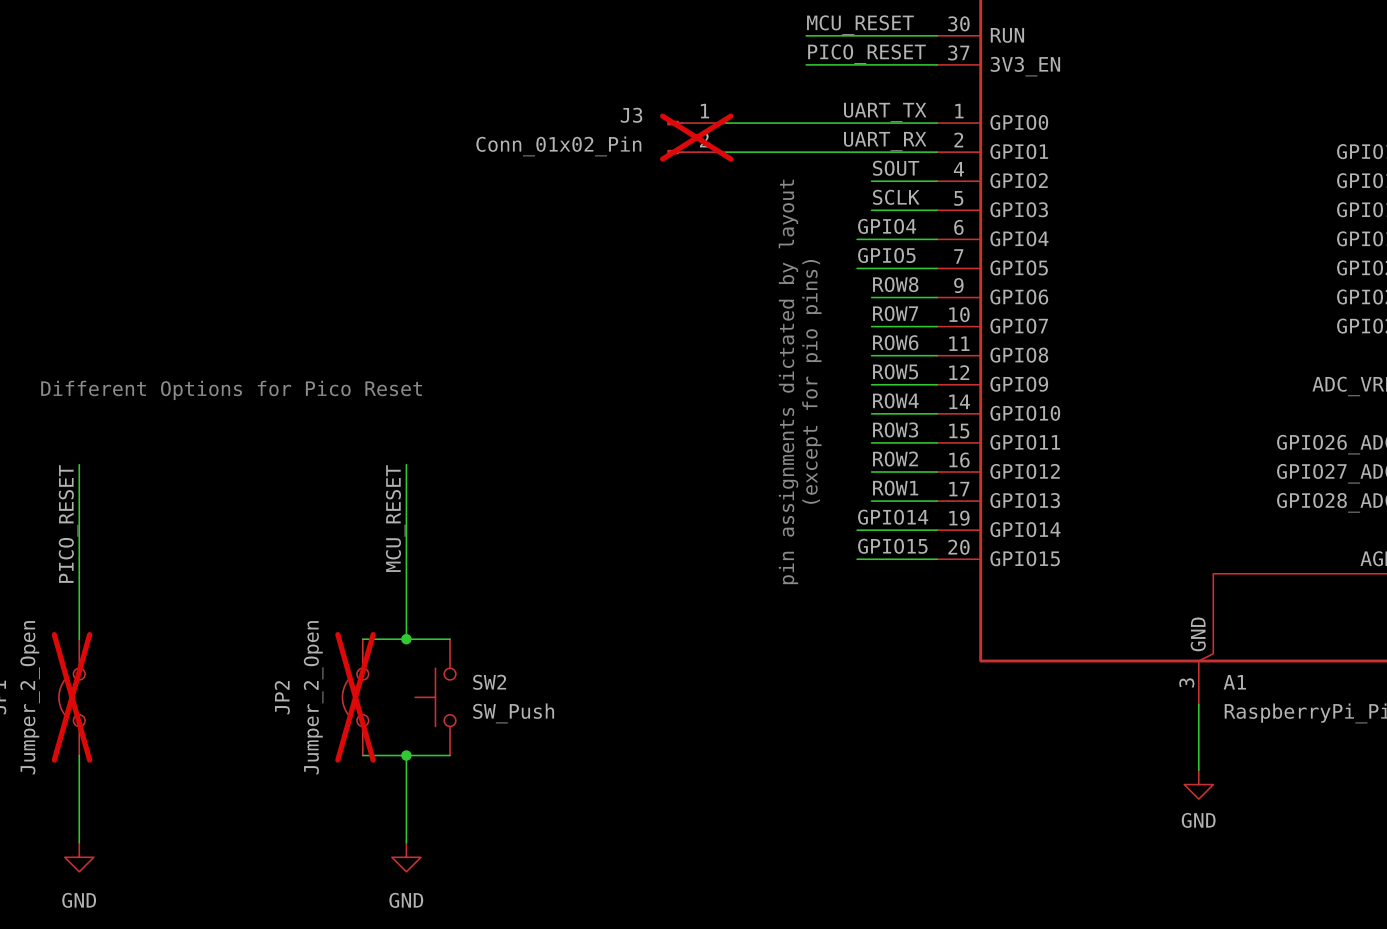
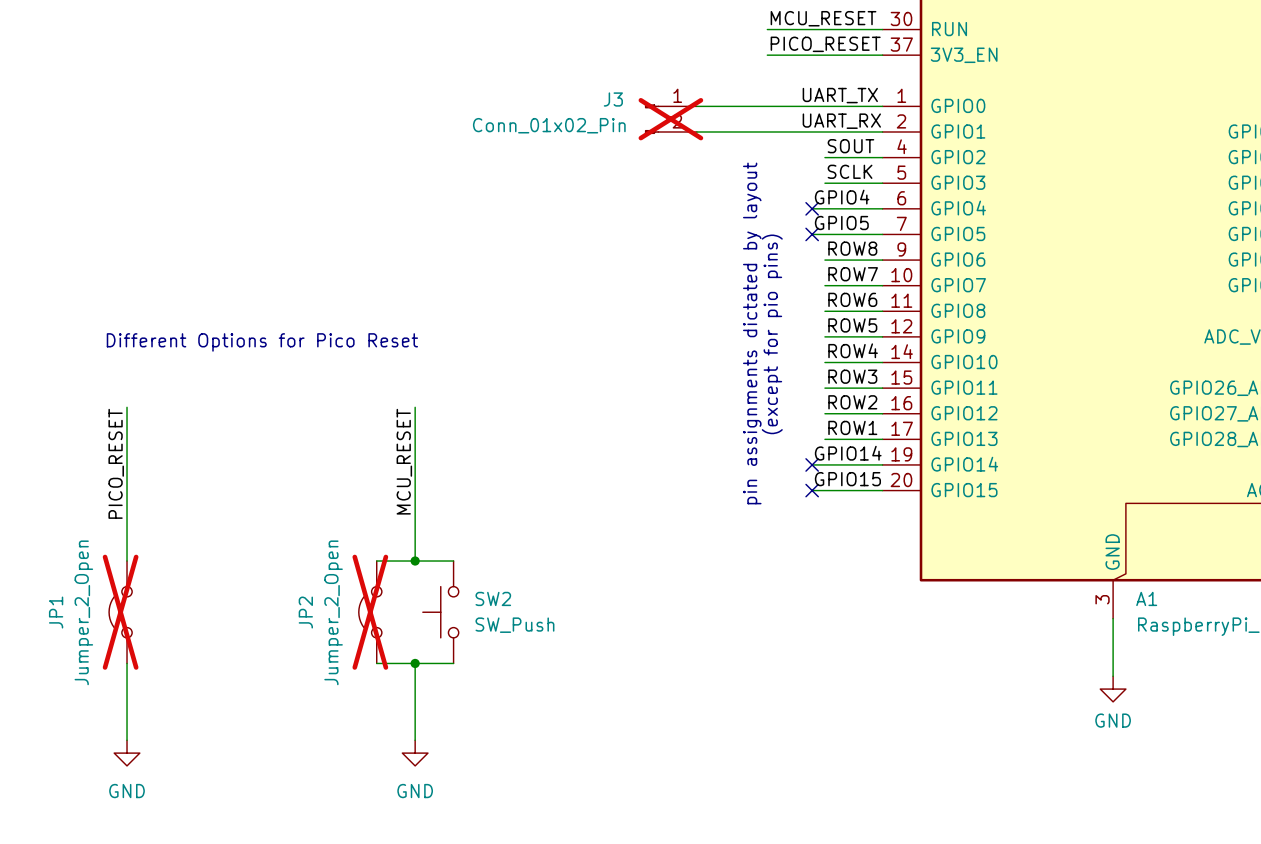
no-connect mark: none -> (812, 208)
no-connect mark: none -> (812, 234)
no-connect mark: none -> (812, 464)
no-connect mark: none -> (812, 490)

